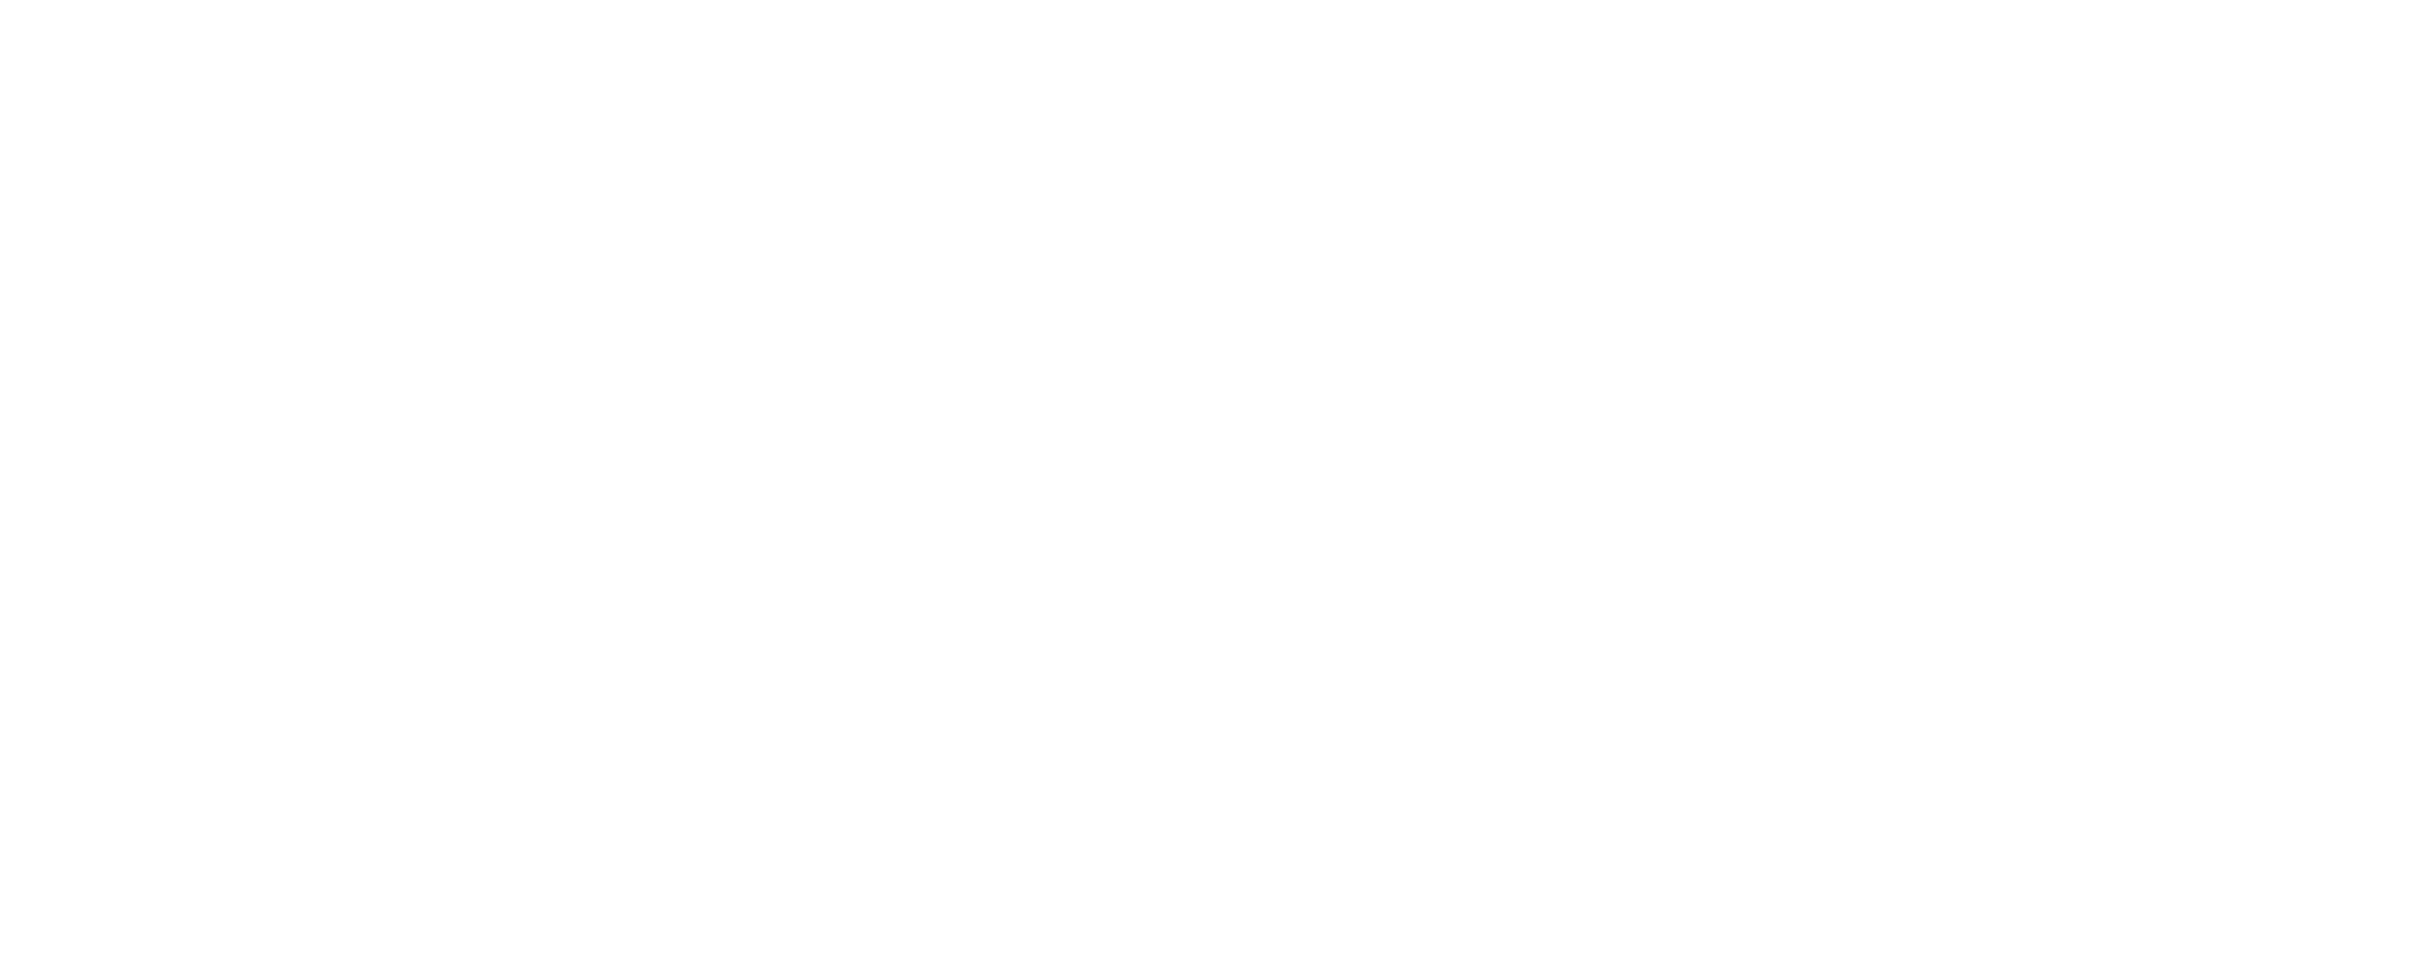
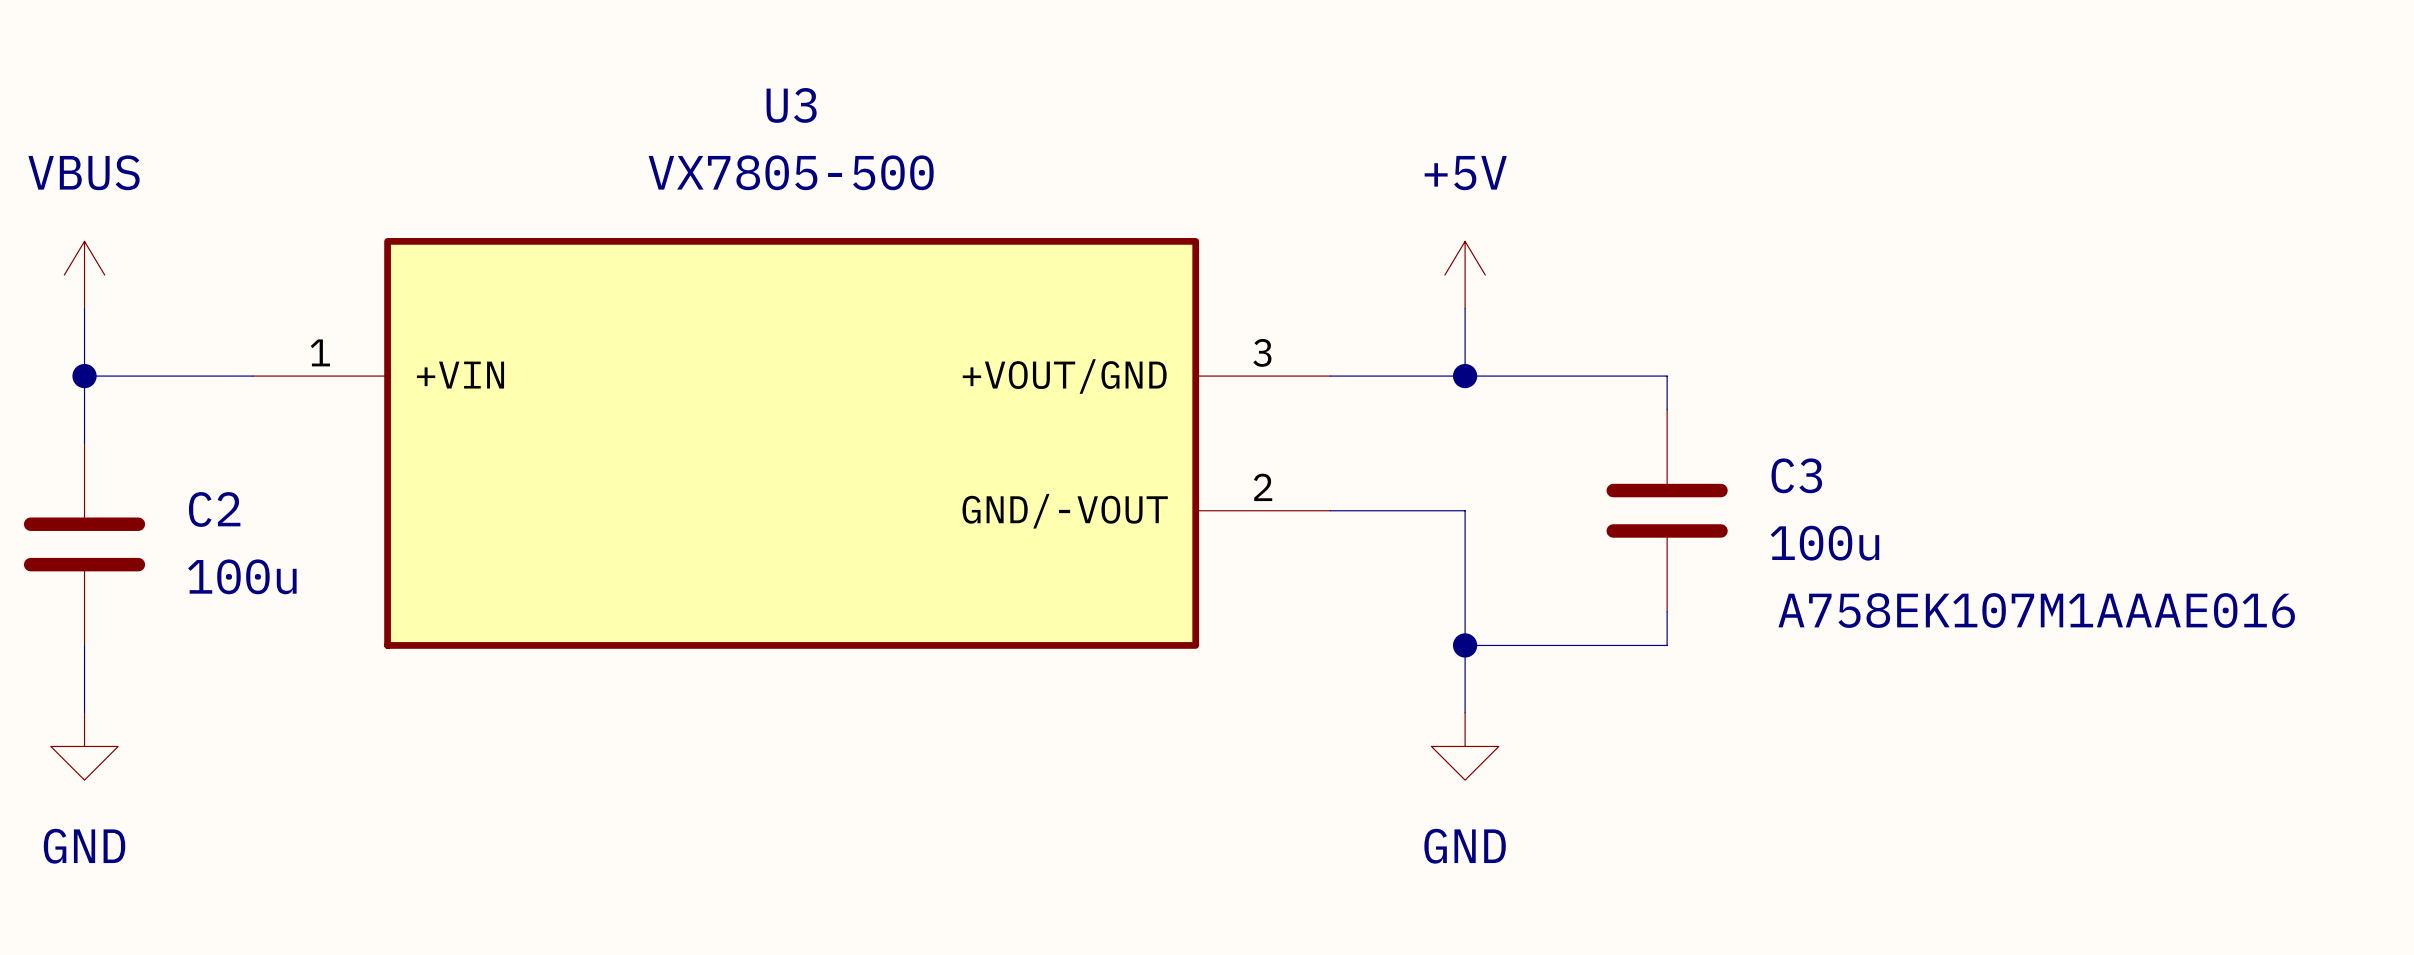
power symbol: none -> VBUS (84, 275)
power symbol: none -> +5V (1465, 275)
wire: none -> (84, 308) (84, 443)
wire: none -> (1465, 308) (1465, 376)
wire: none -> (84, 376) (252, 376)
junction: none -> (84, 376)
wire: none -> (1330, 376) (1667, 376) (1667, 409)
junction: none -> (1465, 376)
U3: none -> VX7805-500 (791, 443)
wire: none -> (1330, 510) (1465, 510) (1465, 712)
C3: none -> 100u (1667, 510)
C2: none -> 100u (84, 544)
wire: none -> (1667, 611) (1667, 645) (1465, 645)
wire: none -> (84, 645) (84, 712)
junction: none -> (1465, 645)
power symbol: none -> GND (84, 746)
power symbol: none -> GND (1465, 746)

